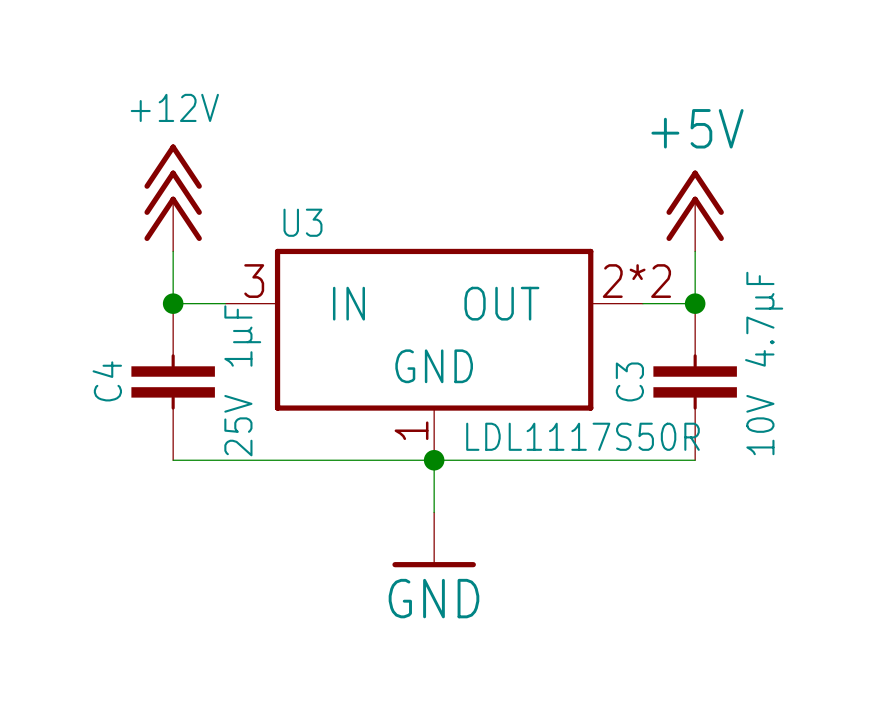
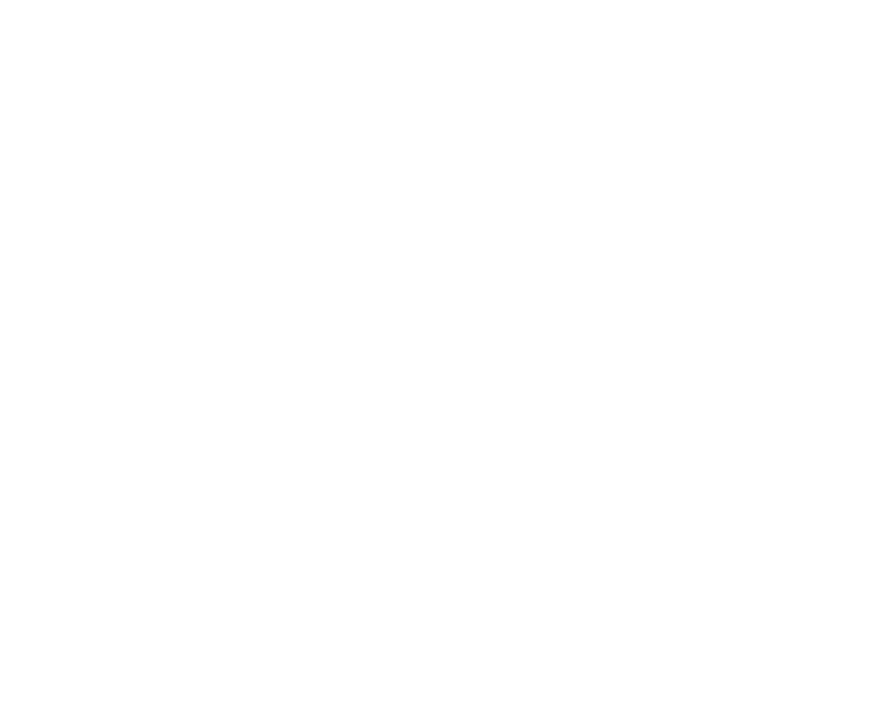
power symbol: +12V (173, 197) -> none
power symbol: +5V (695, 211) -> none
wire: (173, 251) (173, 303) (225, 303) -> none
wire: (695, 251) (695, 303) (642, 303) -> none
junction: (173, 303) -> none
junction: (695, 303) -> none
U3: (434, 354) -> none
C4: (173, 381) -> none
C3: (695, 381) -> none
wire: (173, 460) (695, 460) -> none
wire: (434, 460) (434, 512) -> none
junction: (434, 460) -> none
power symbol: GND (434, 539) -> none

